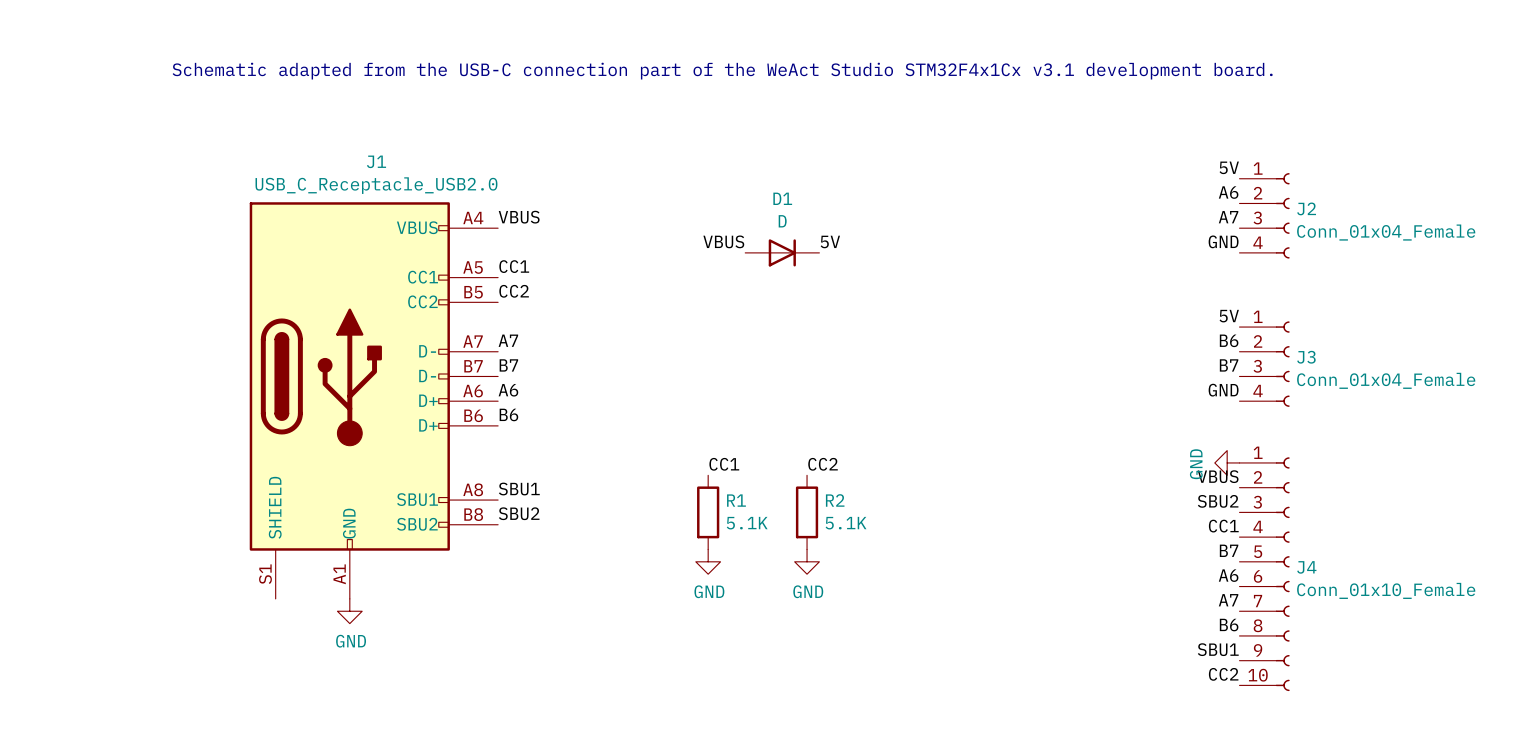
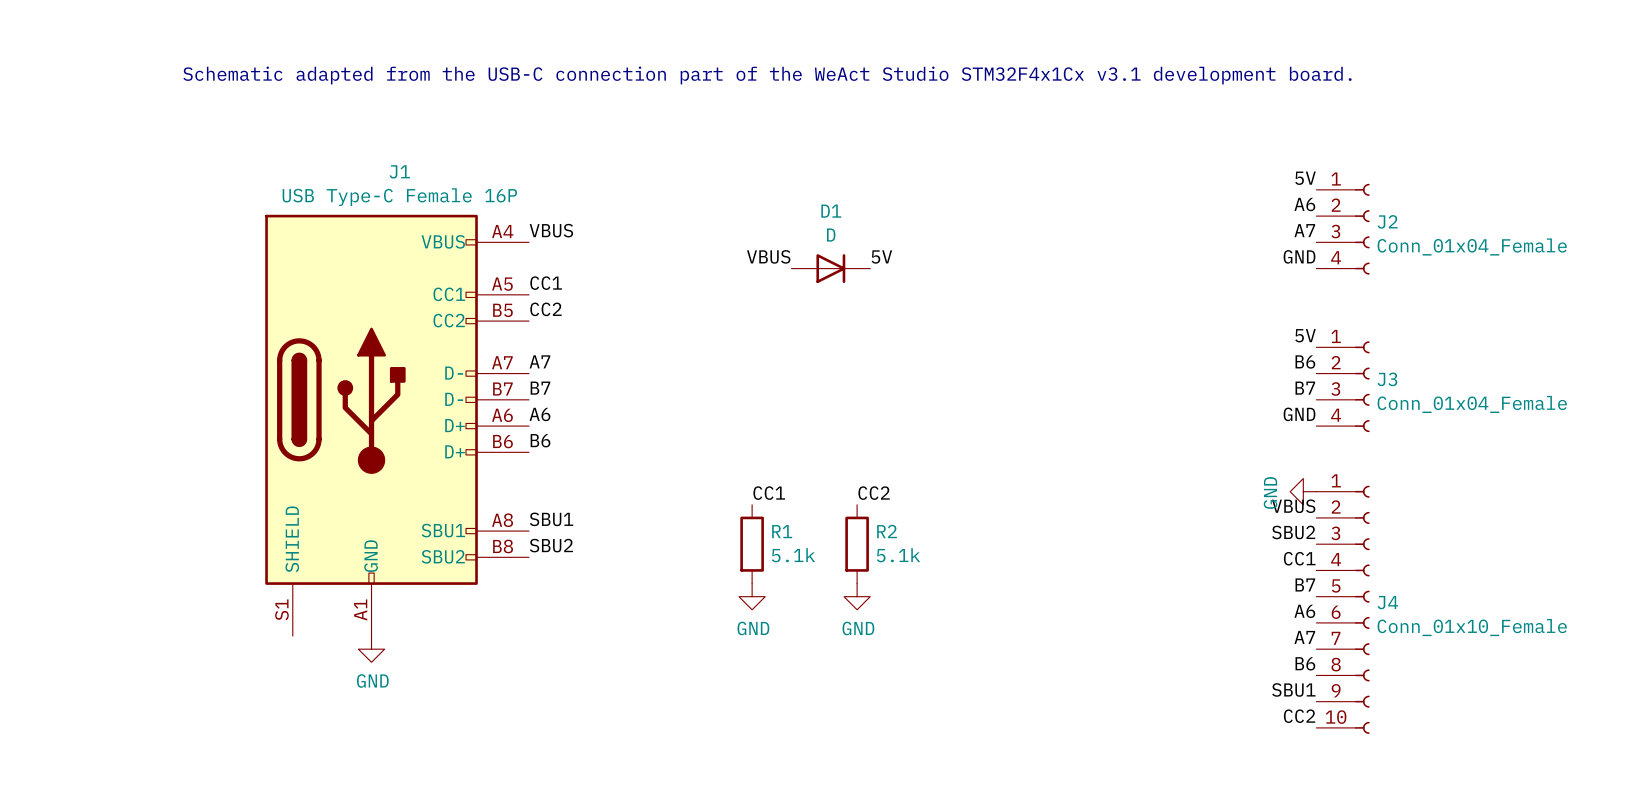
J1 value: USB_C_Receptacle_USB2.0 (376, 185) -> USB Type-C Female 16P (399, 197)
R1 value: 5.1K (747, 523) -> 5.1k (793, 555)
R2 value: 5.1K (846, 523) -> 5.1k (898, 555)

